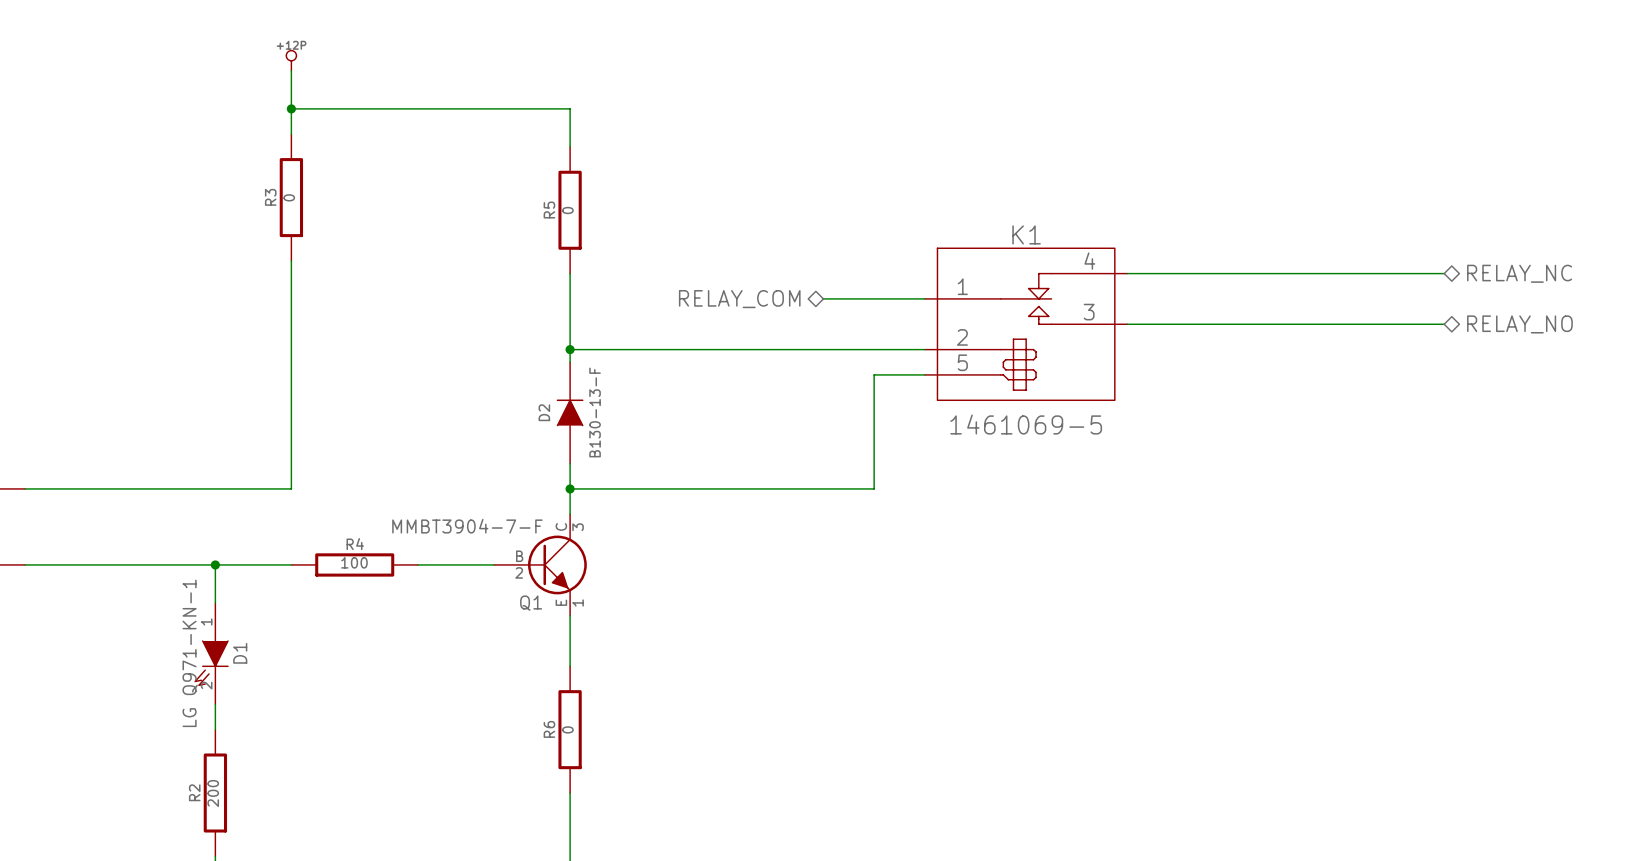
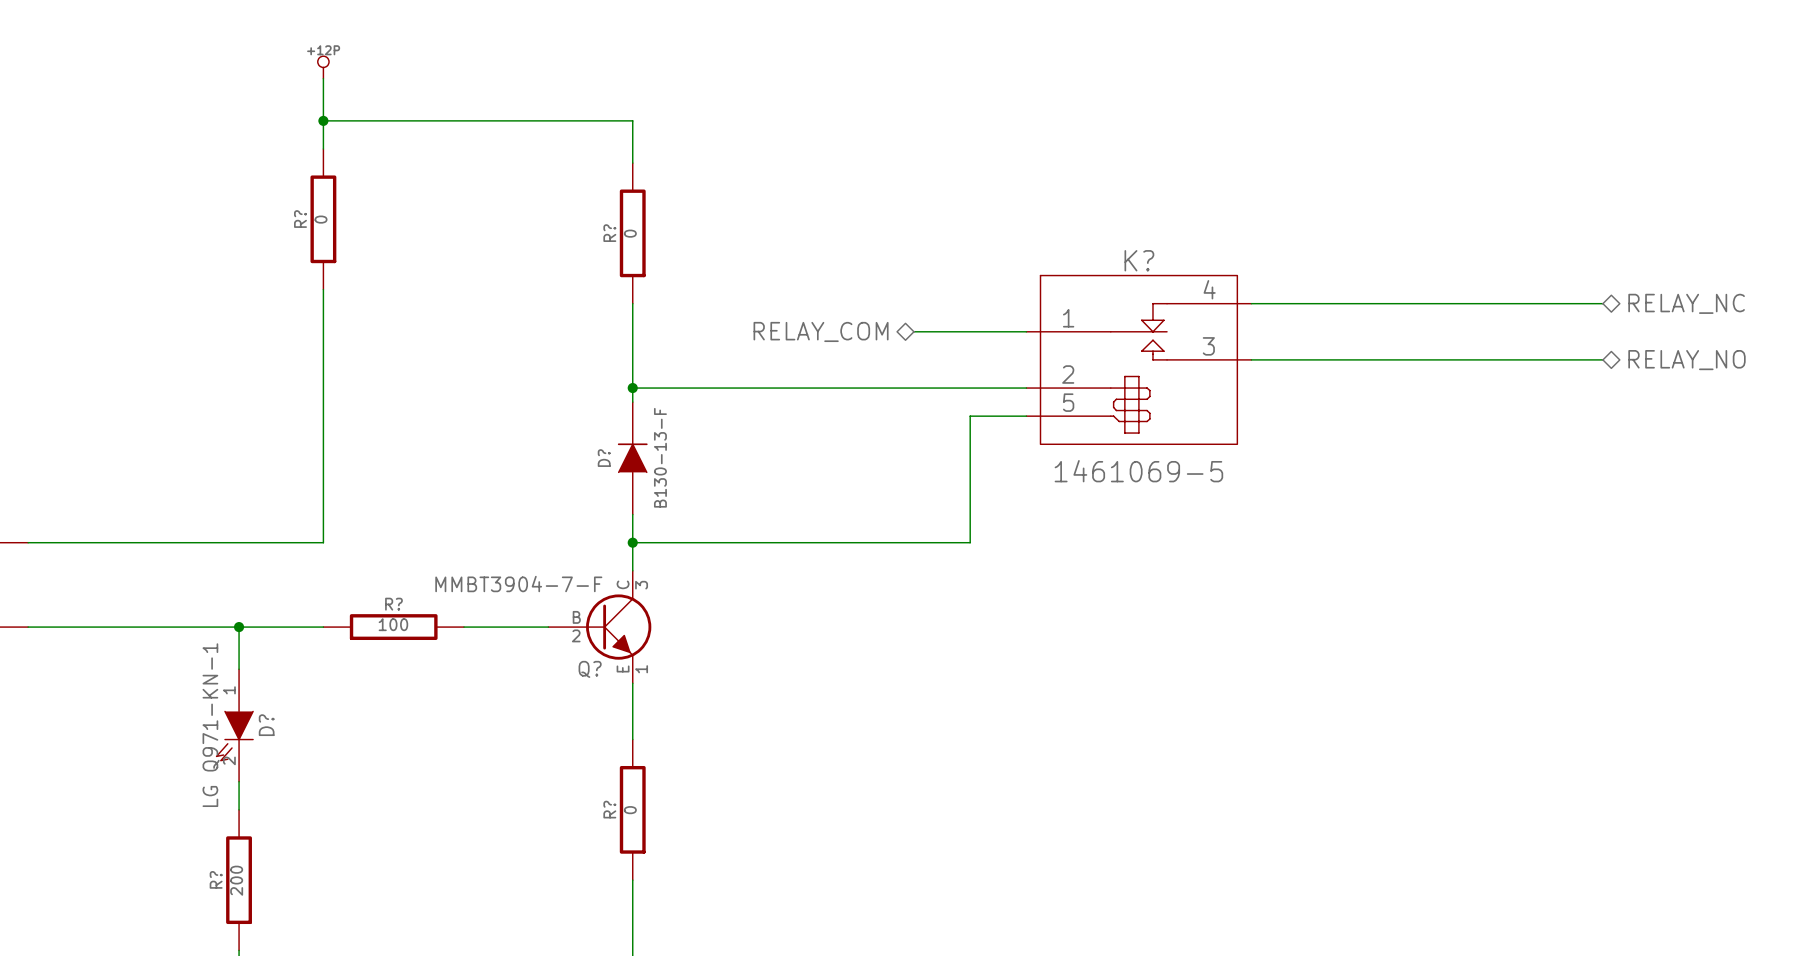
R3 name: R3 (270, 197) -> R? (300, 219)
R5 name: R5 (549, 210) -> R? (609, 233)
K1 name: K1 (1026, 234) -> K? (1139, 260)
D2 name: D2 (544, 412) -> D? (604, 458)
R4 name: R4 (355, 544) -> R? (393, 604)
Q1 name: Q1 (531, 603) -> Q? (590, 669)
D1 name: D1 (240, 653) -> D? (266, 725)
R6 name: R6 (549, 729) -> R? (609, 809)
R2 name: R2 (194, 792) -> R? (216, 879)

